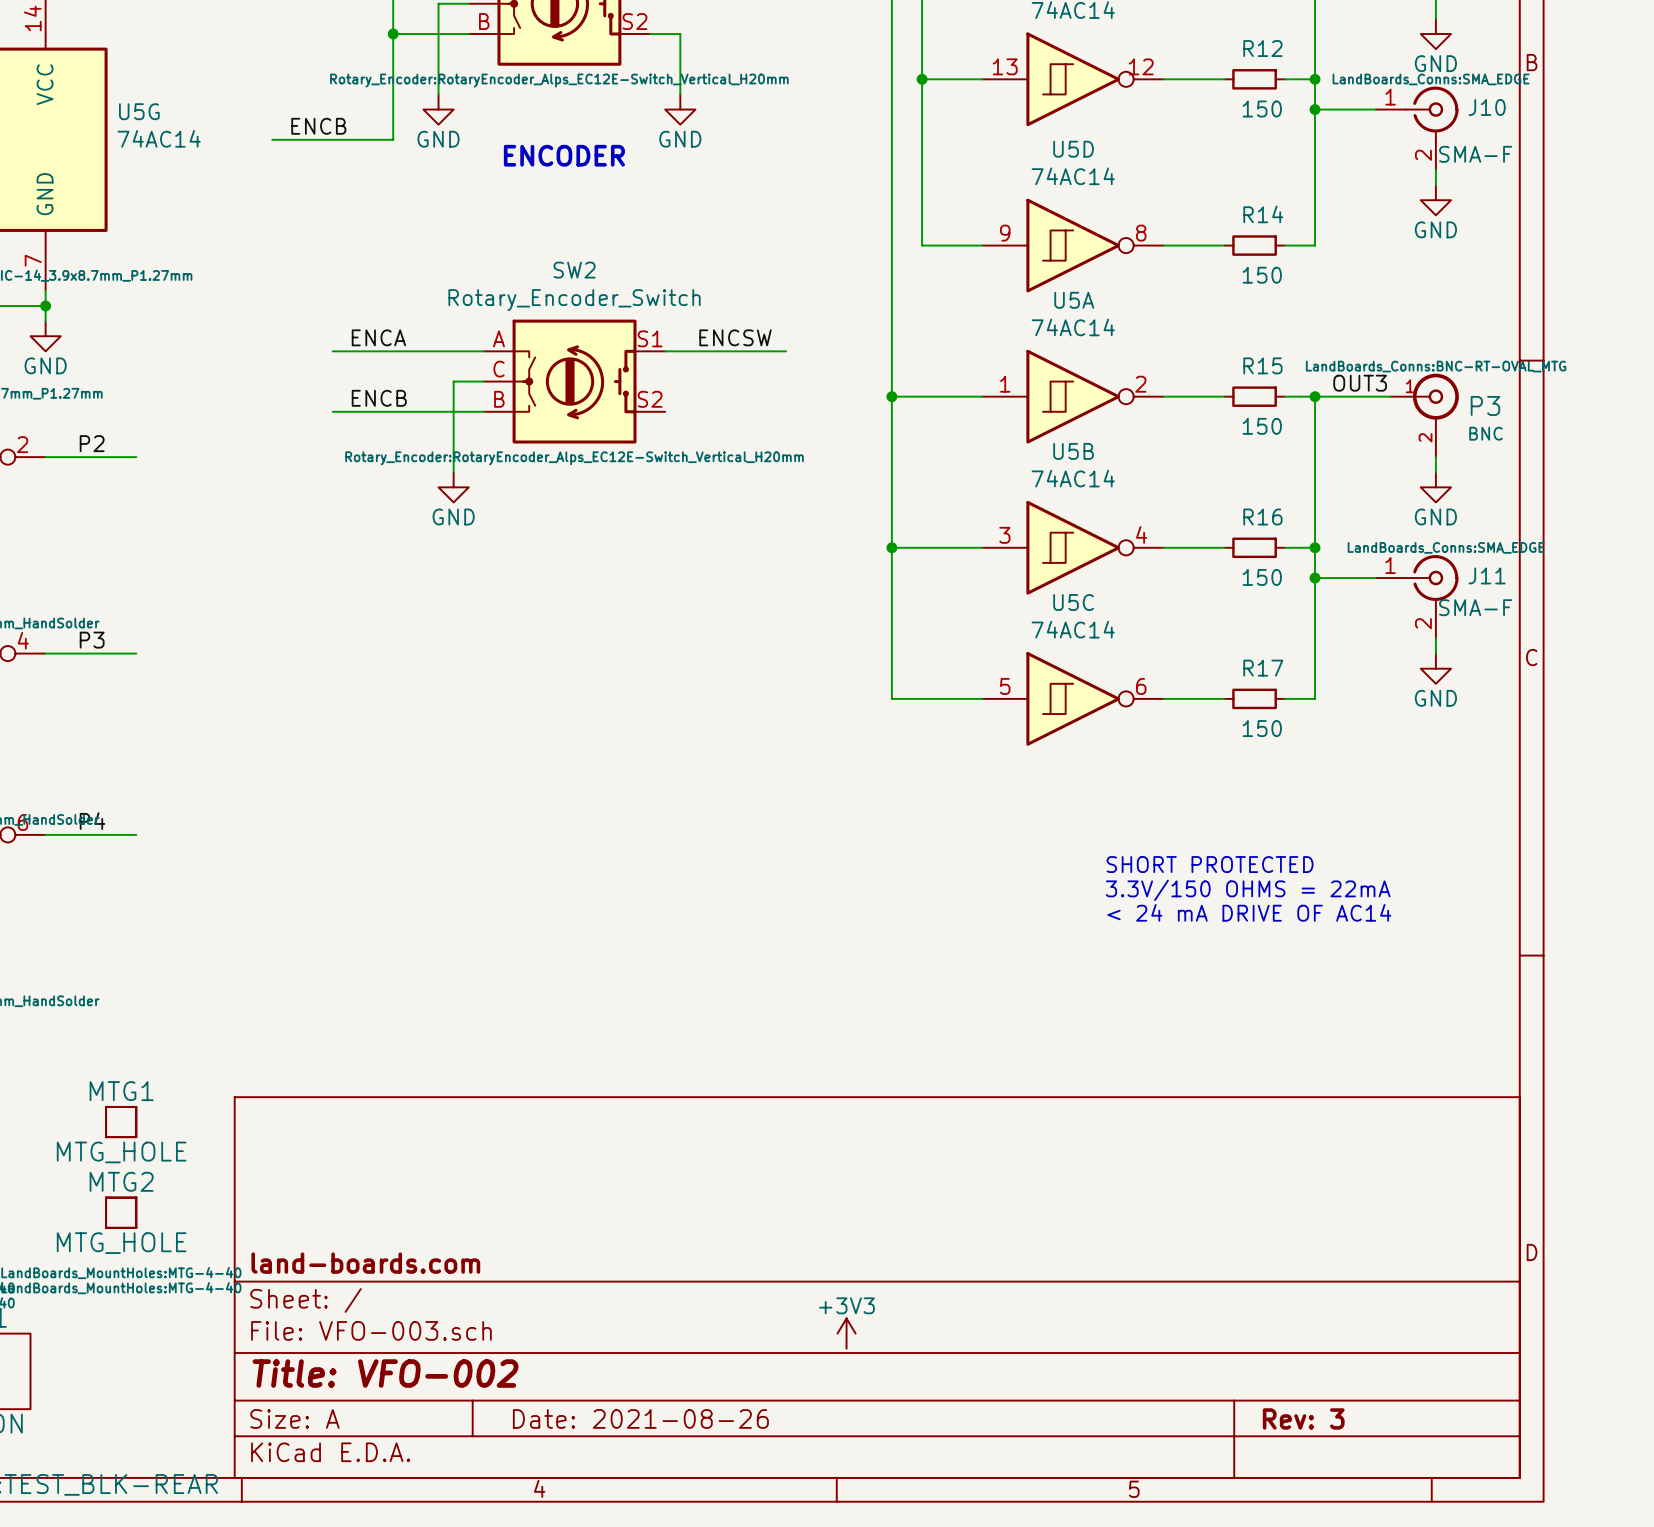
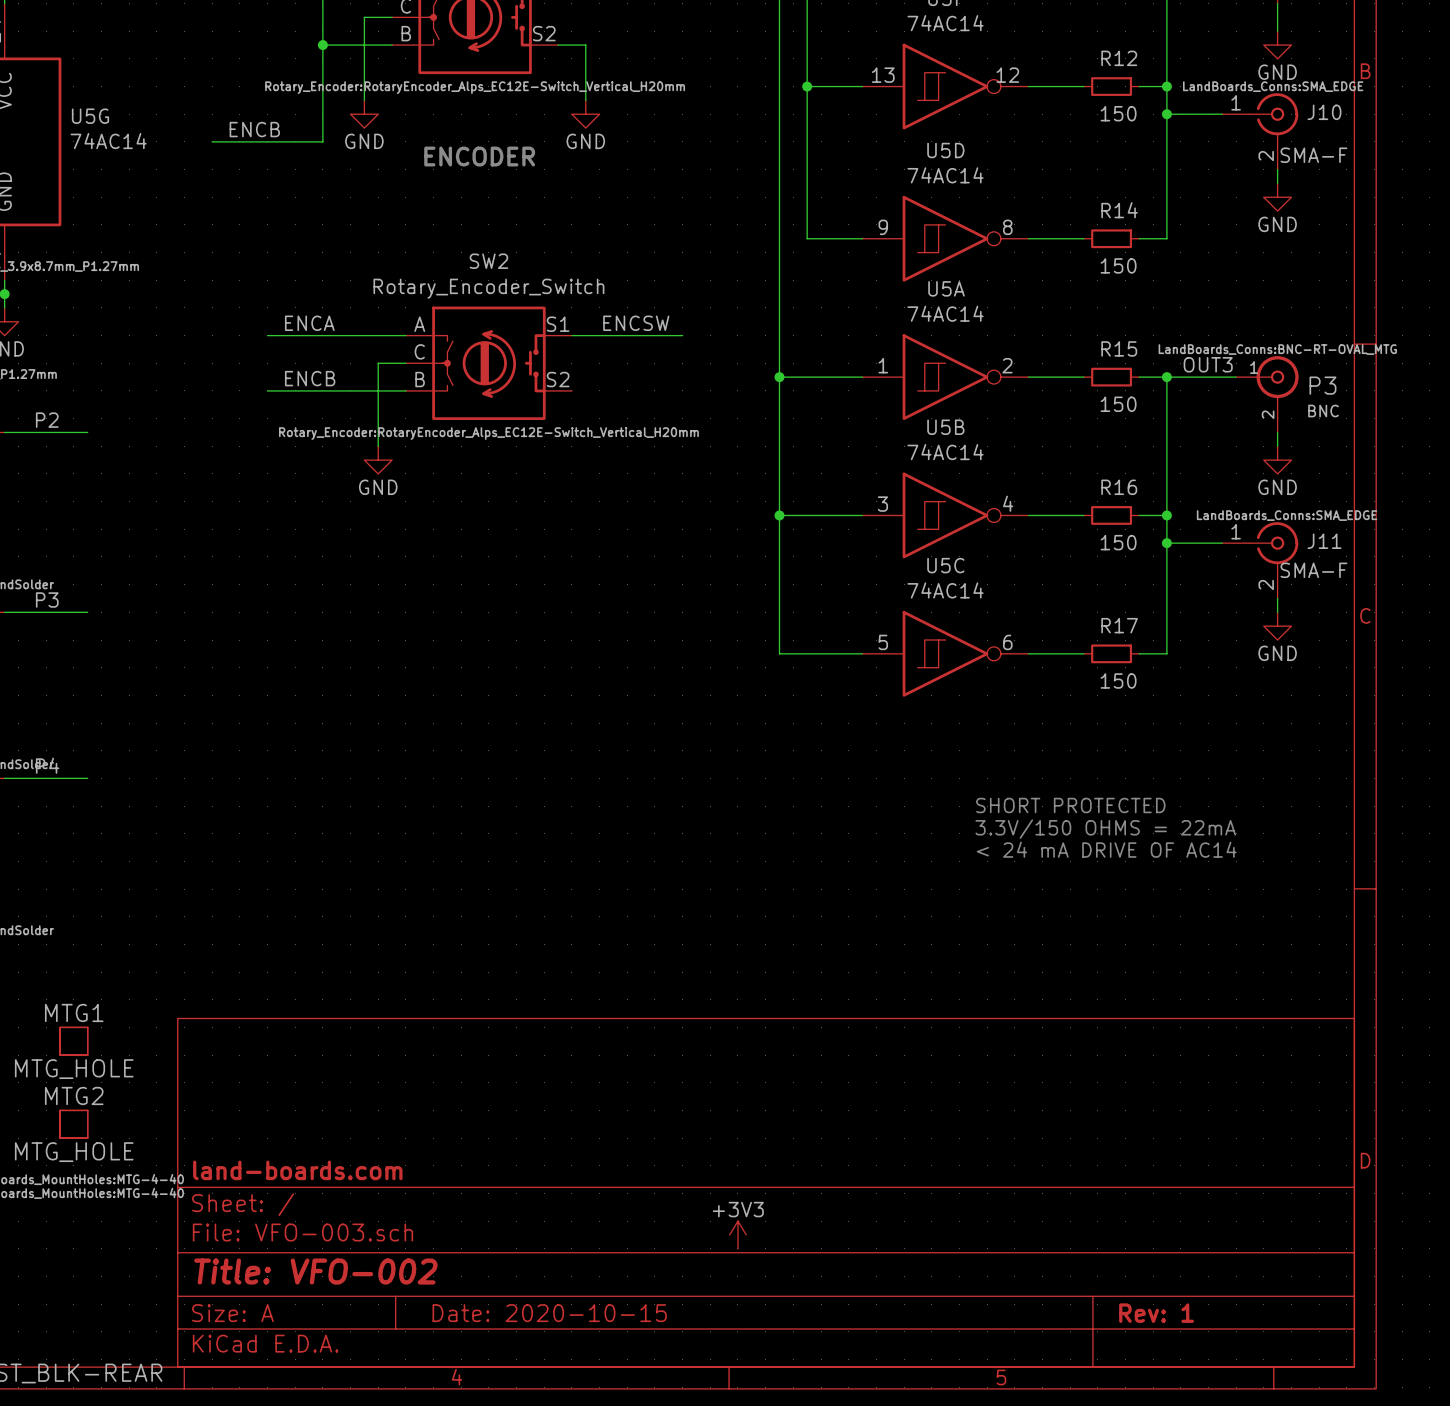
title block: Date: 2021-08-26 (640, 1418) -> Date: 2020-10-15 (549, 1313)
title block: Rev: 3 (1303, 1418) -> Rev: 1 (1156, 1313)

